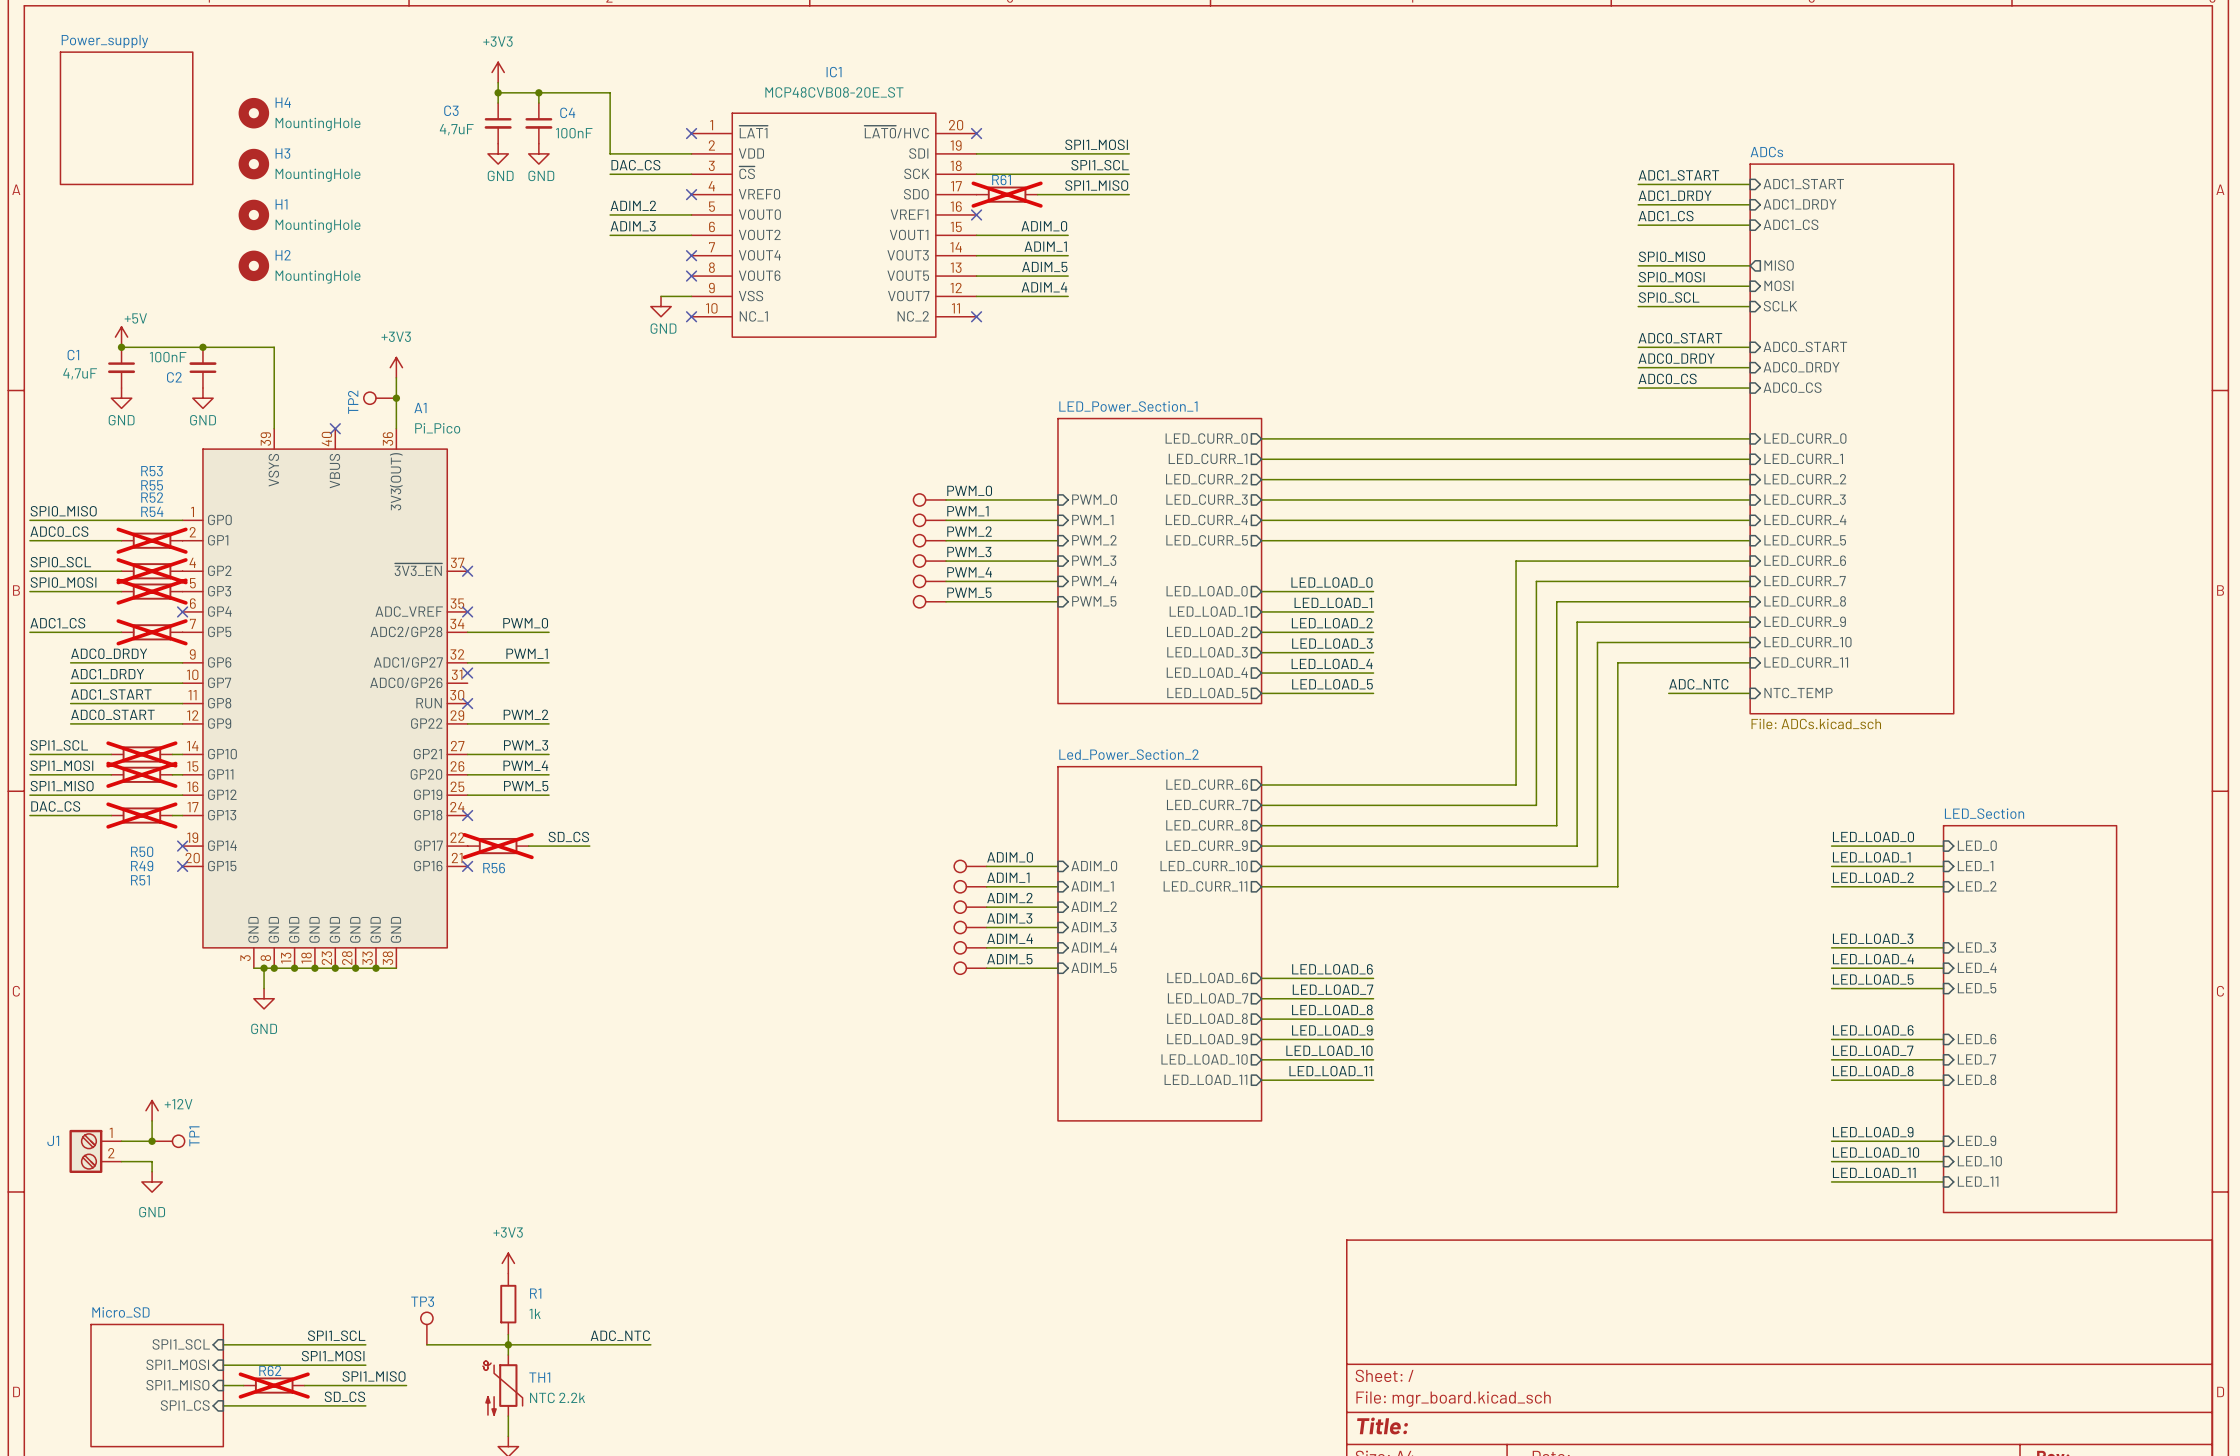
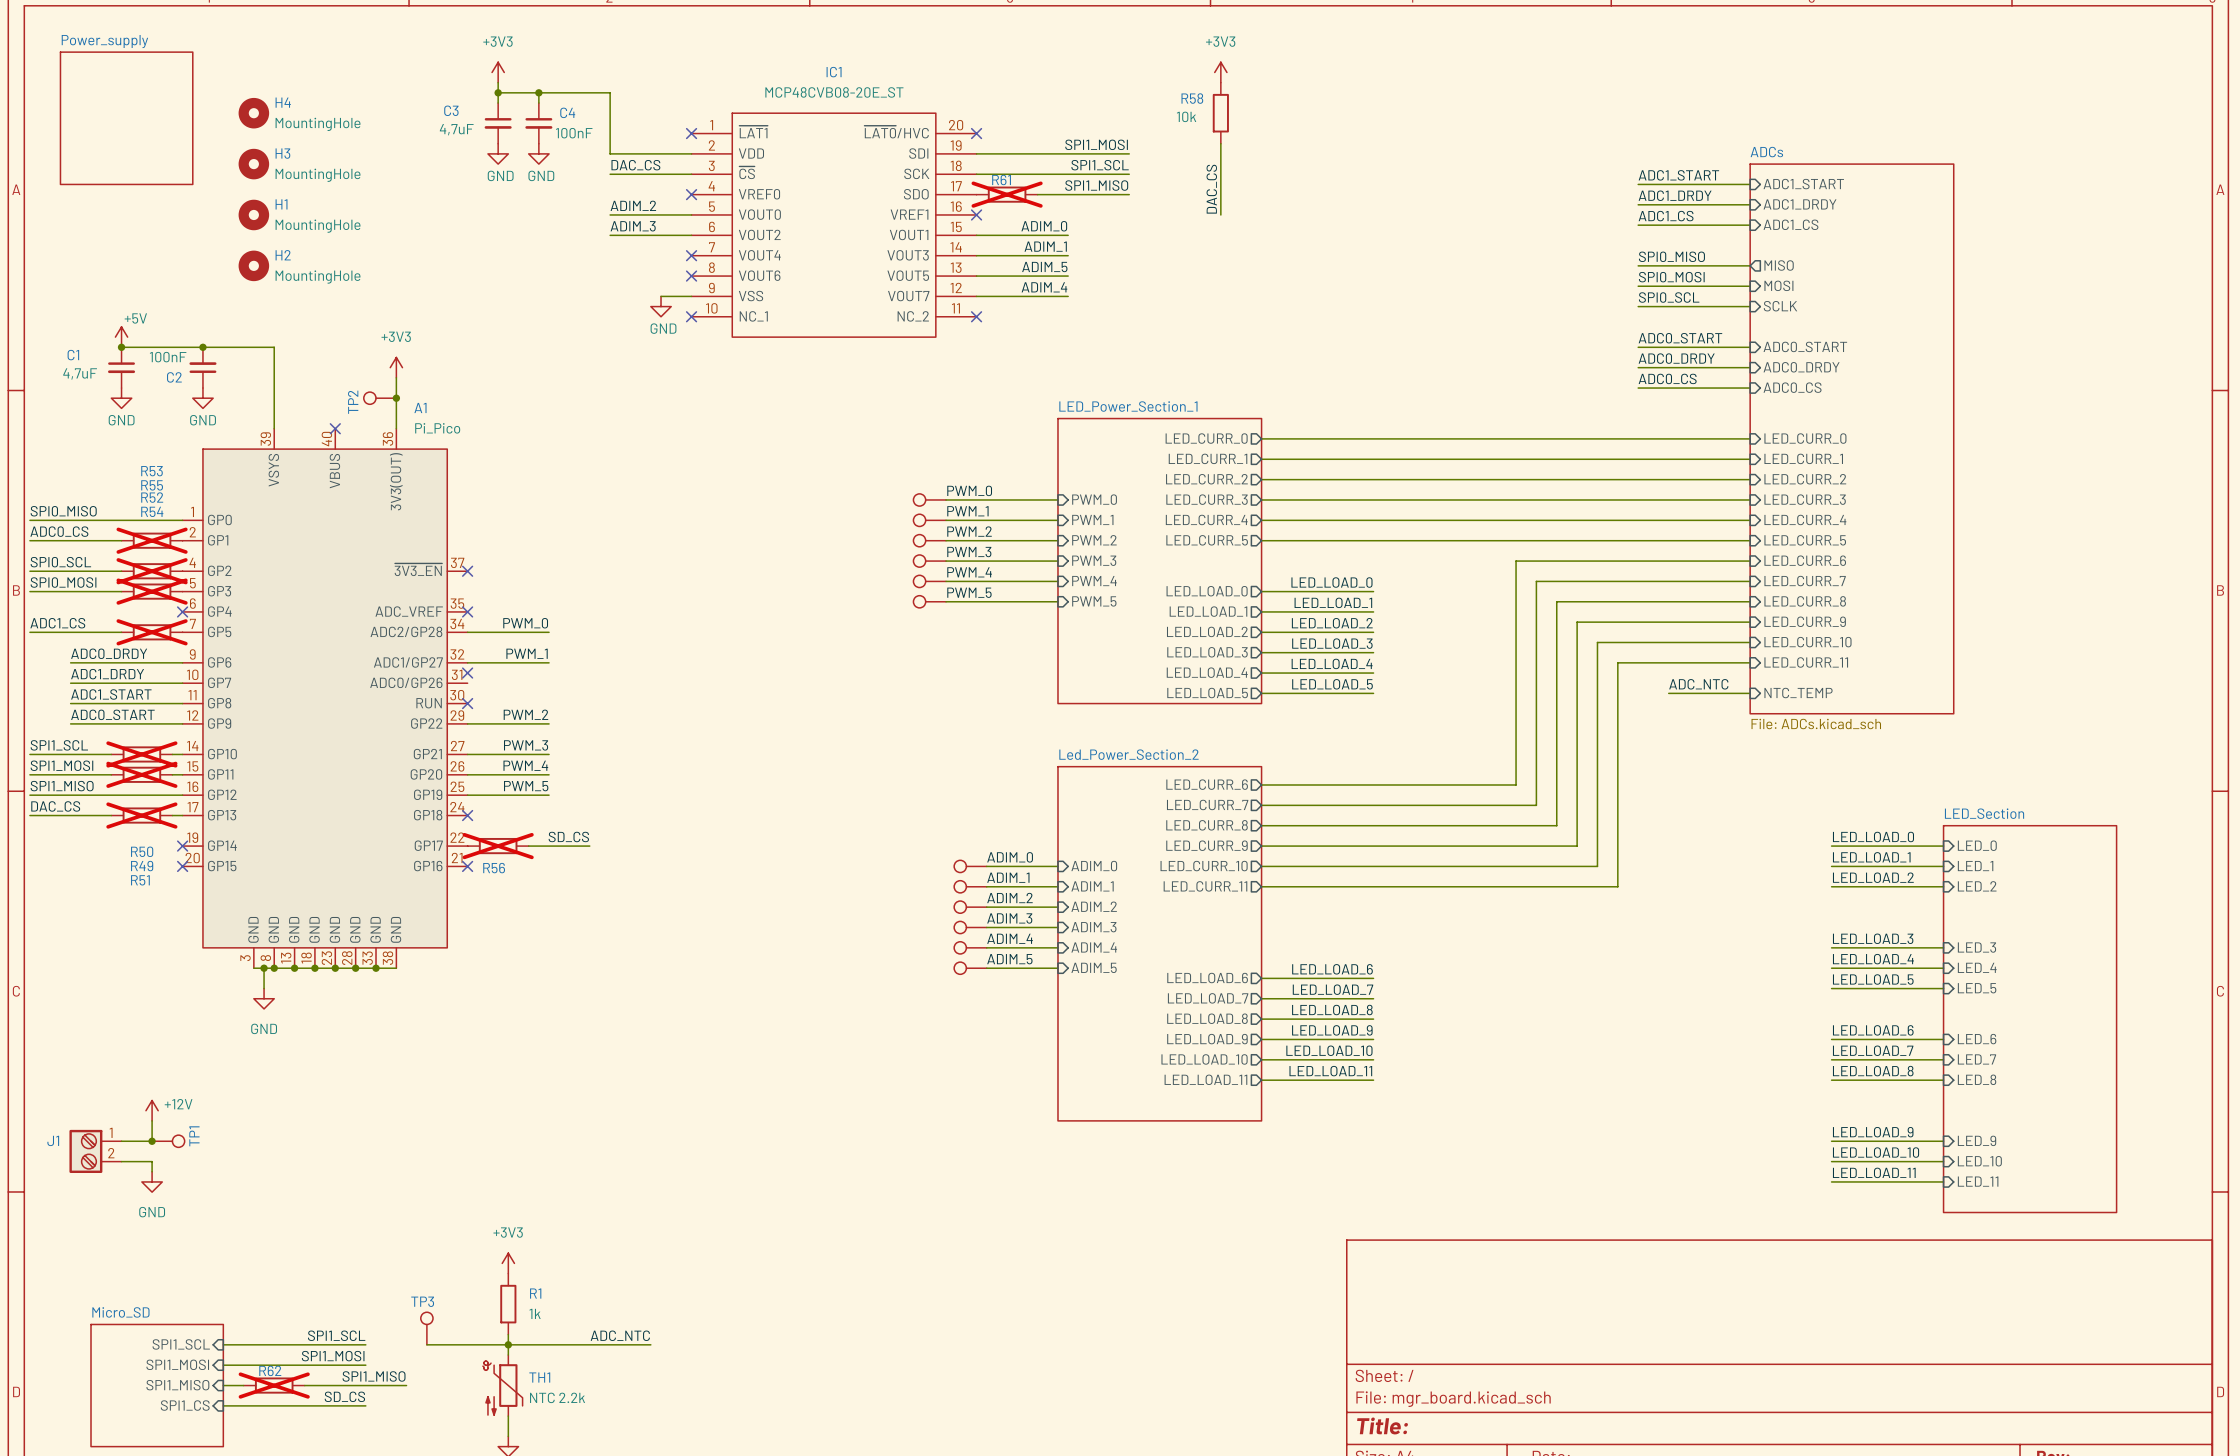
power symbol: none -> +3V3 (1220, 72)
R58: none -> 10k (1220, 113)
wire: none -> (1220, 143) (1220, 214)
label: none -> DAC_CS (1211, 189)

